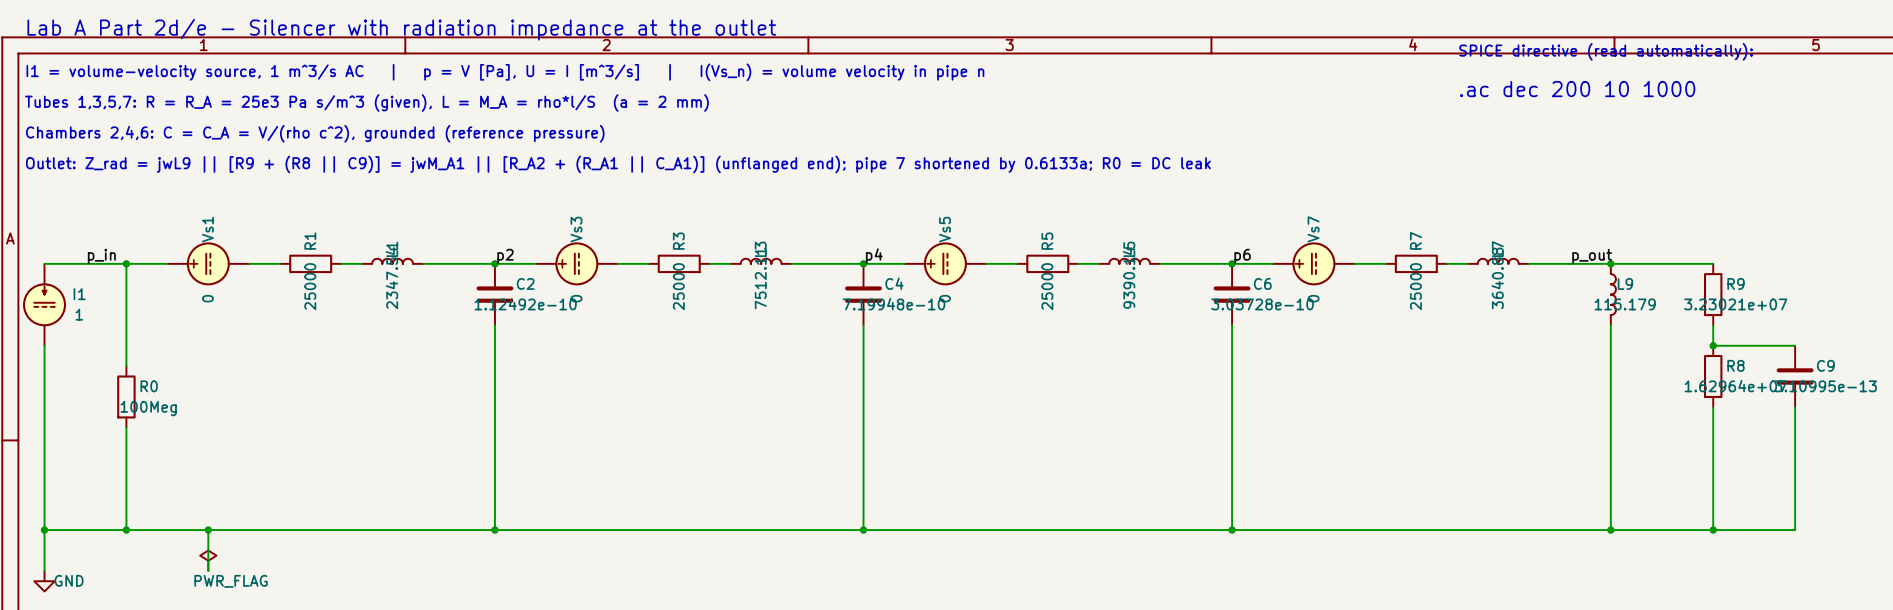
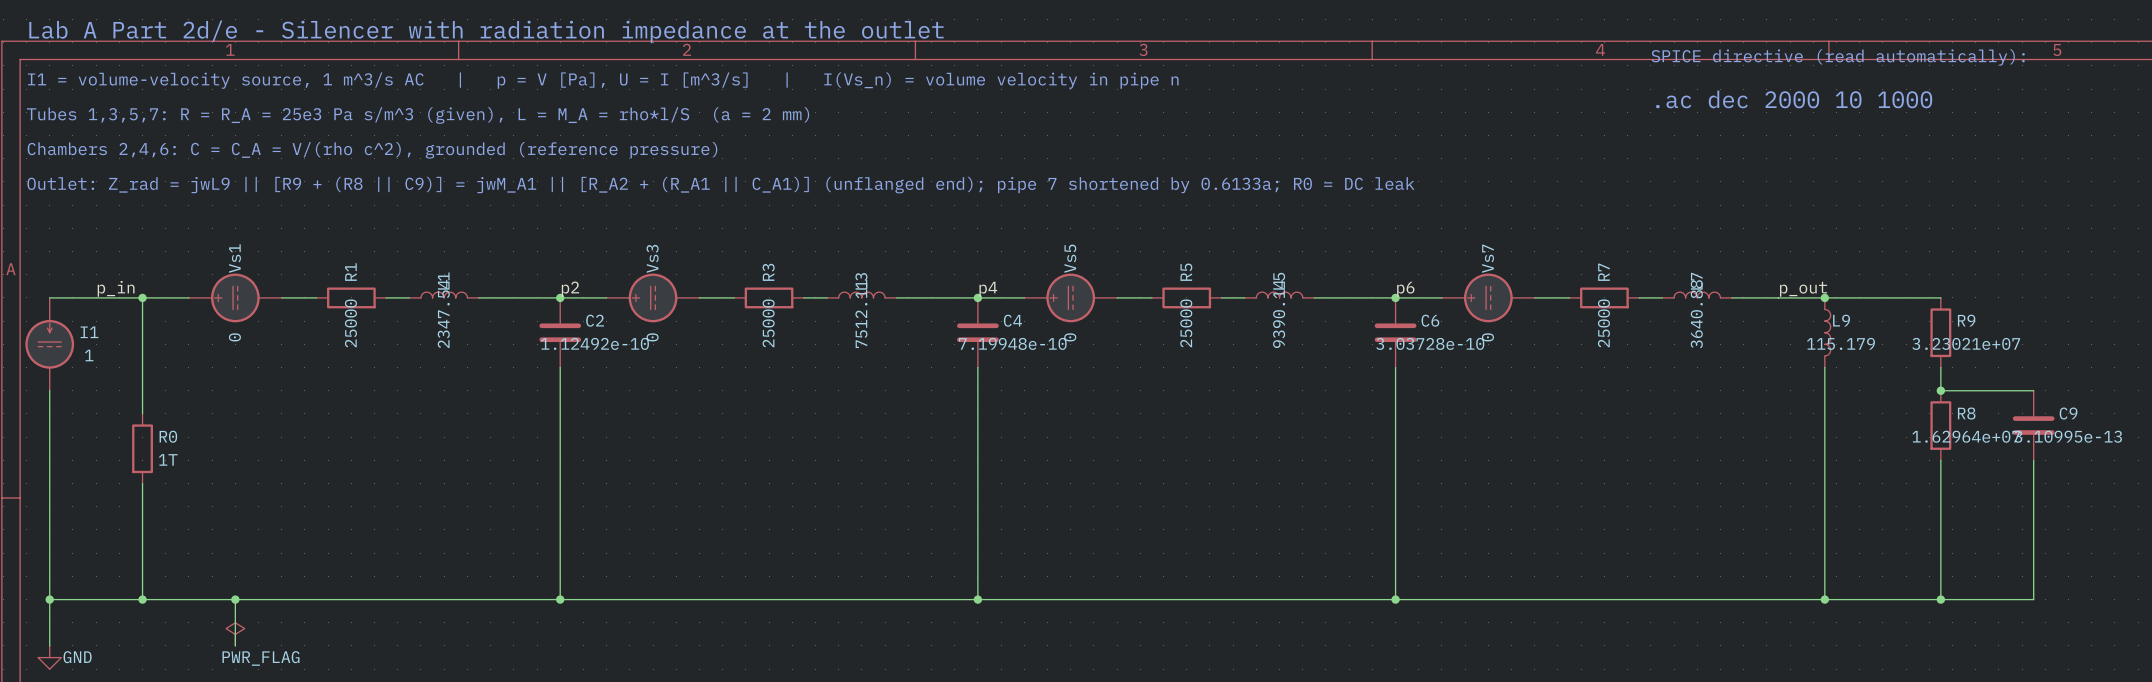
text: .ac dec 200 10 1000 (1577, 89) -> .ac dec 2000 10 1000 (1794, 99)
R0 value: 100Meg (148, 408) -> 1T (168, 459)

